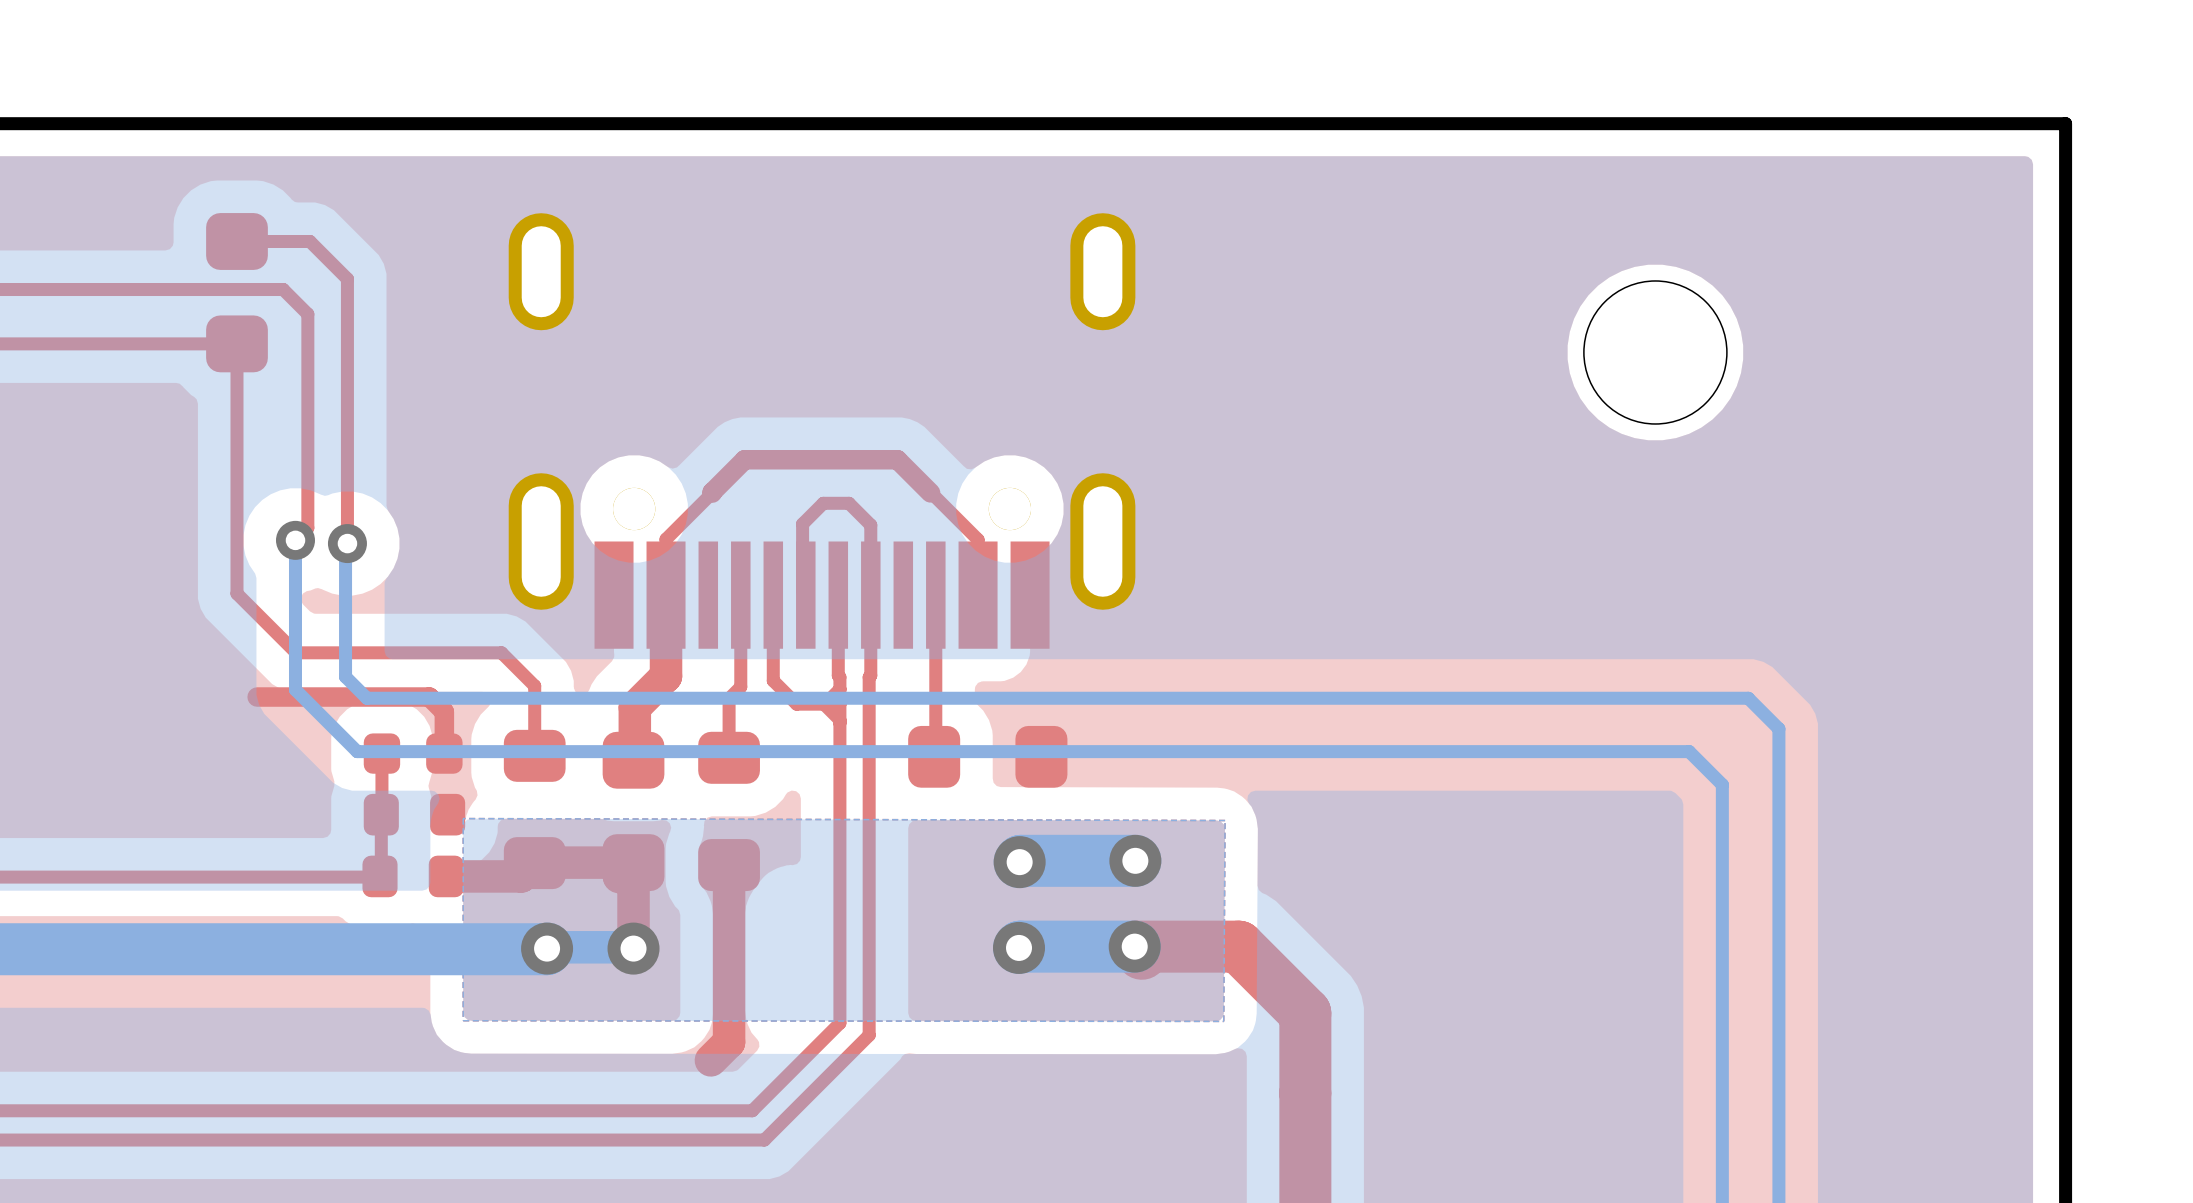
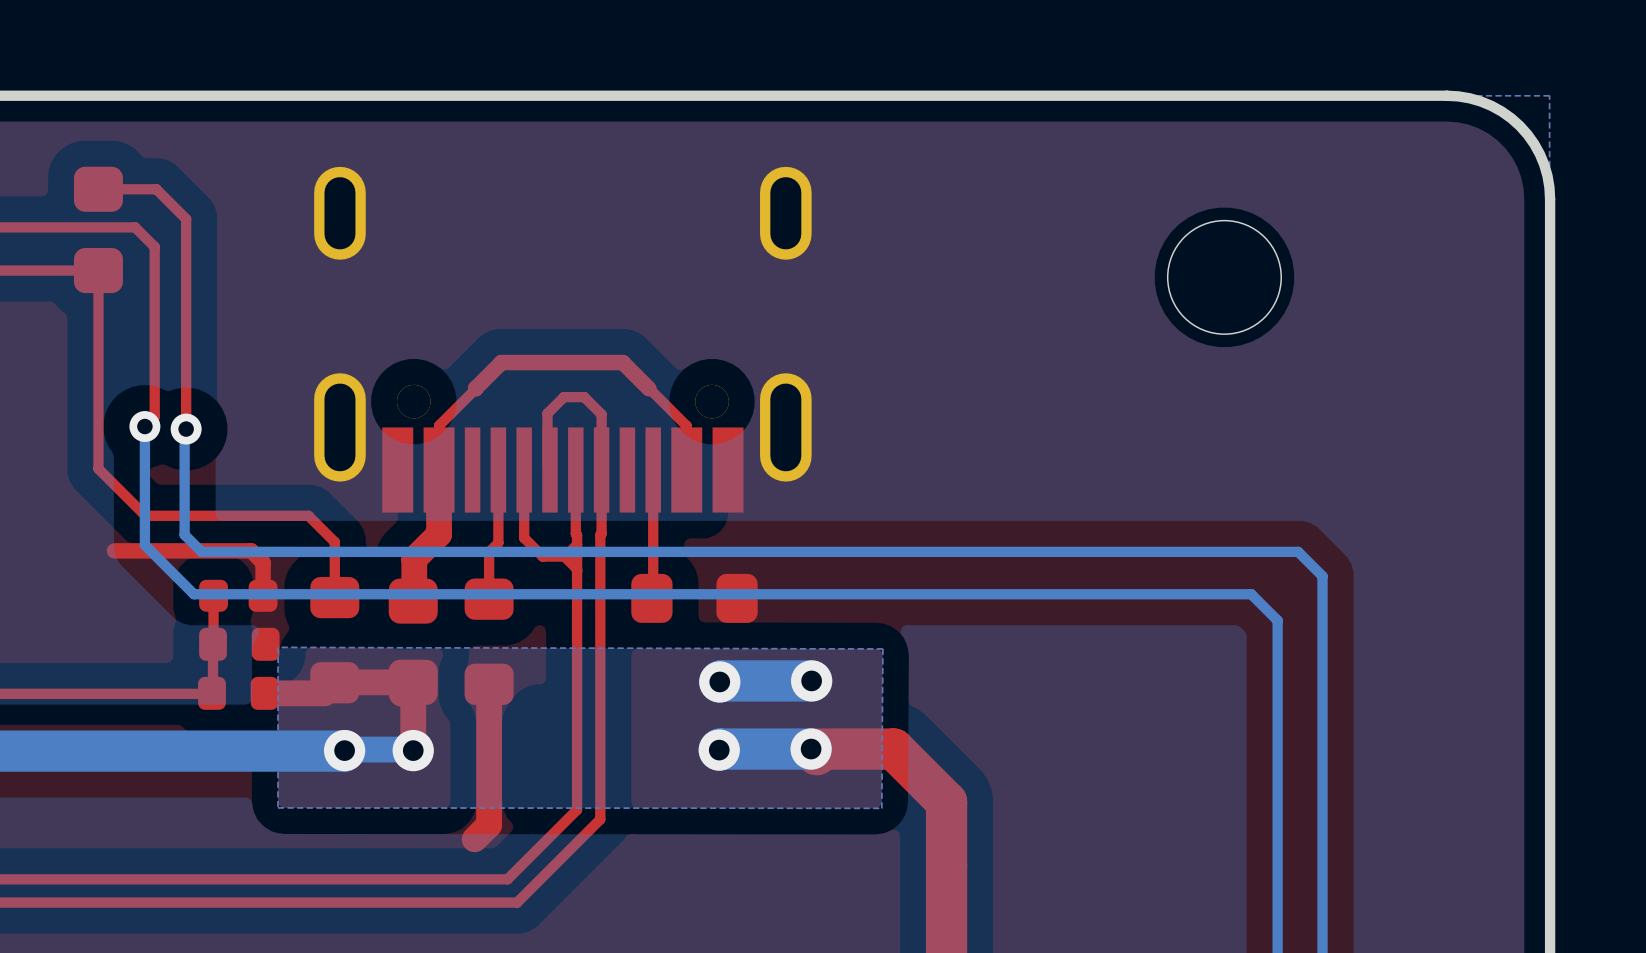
board edge: (1935, 123) (2065, 123) (2065, 253) -> (1446, 95) (1469, 98) (1491, 105) (1519, 125) (1534, 144) (1544, 164) (1550, 198)

